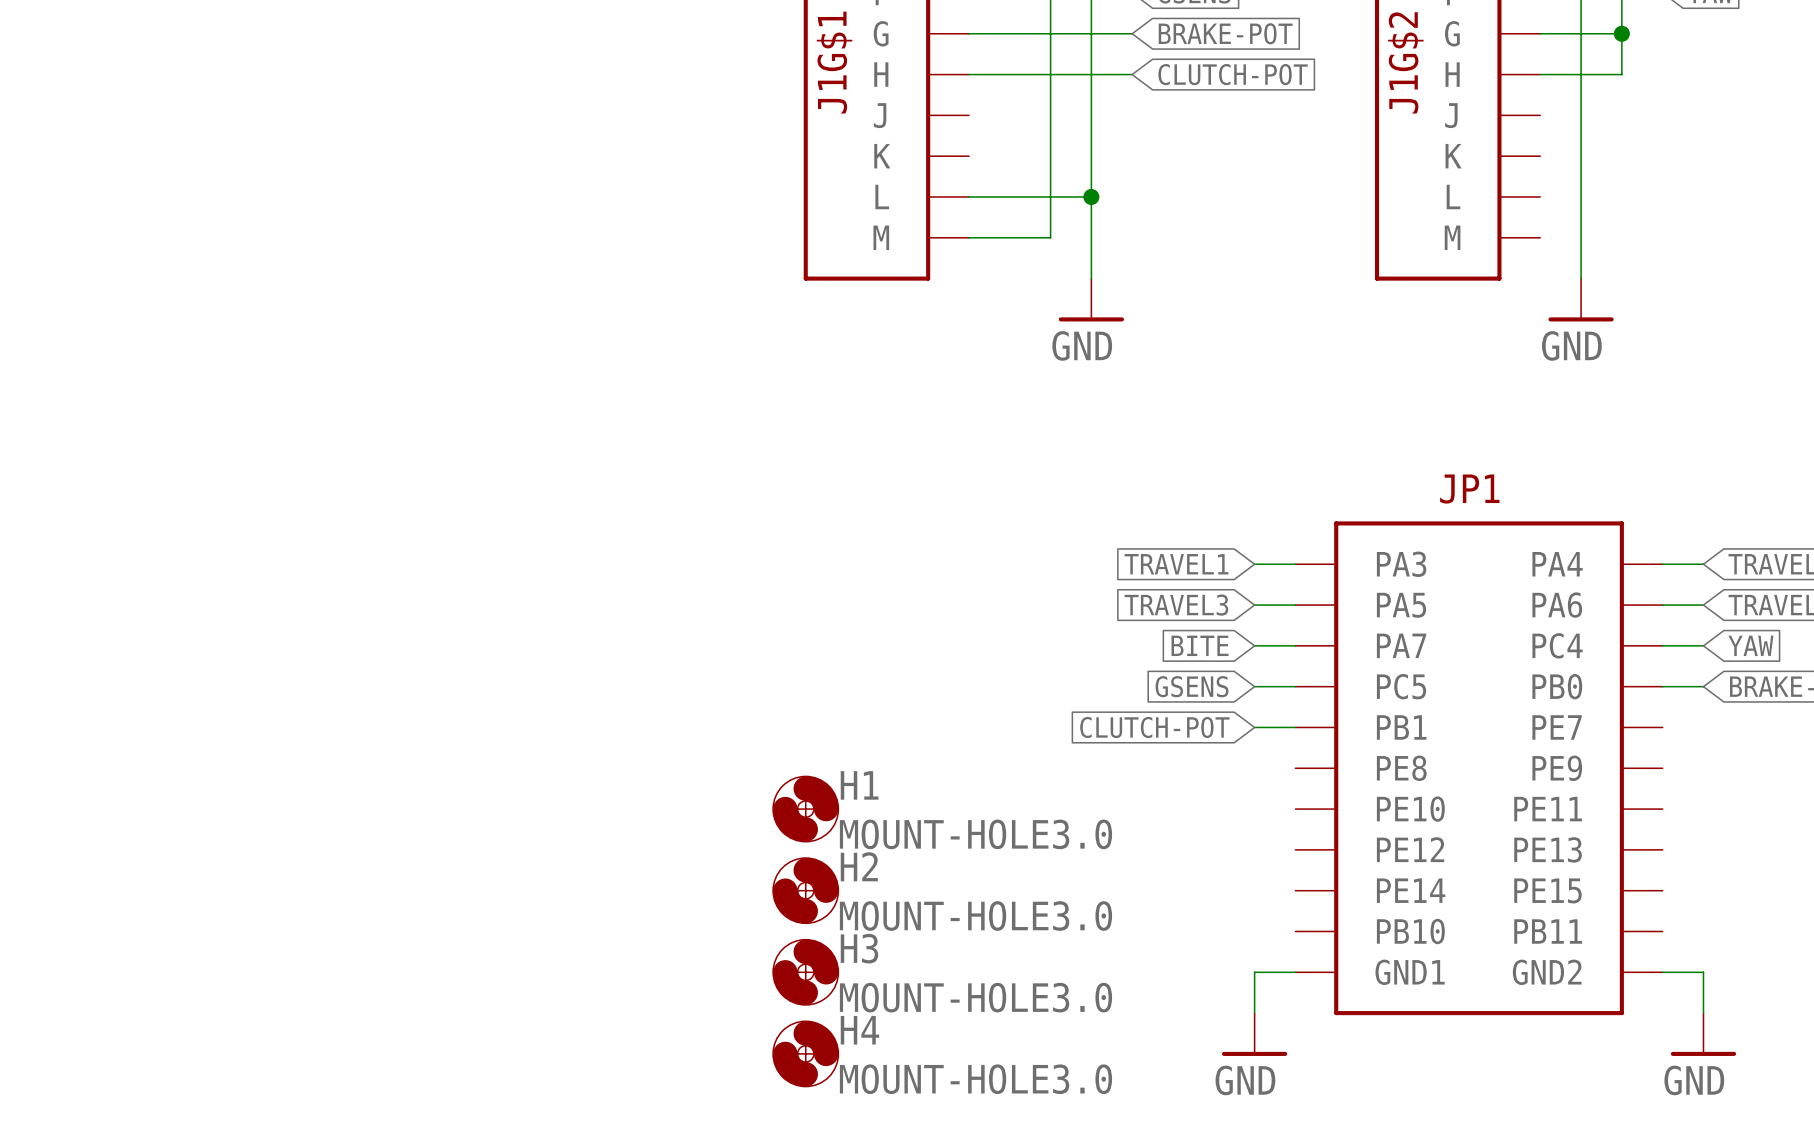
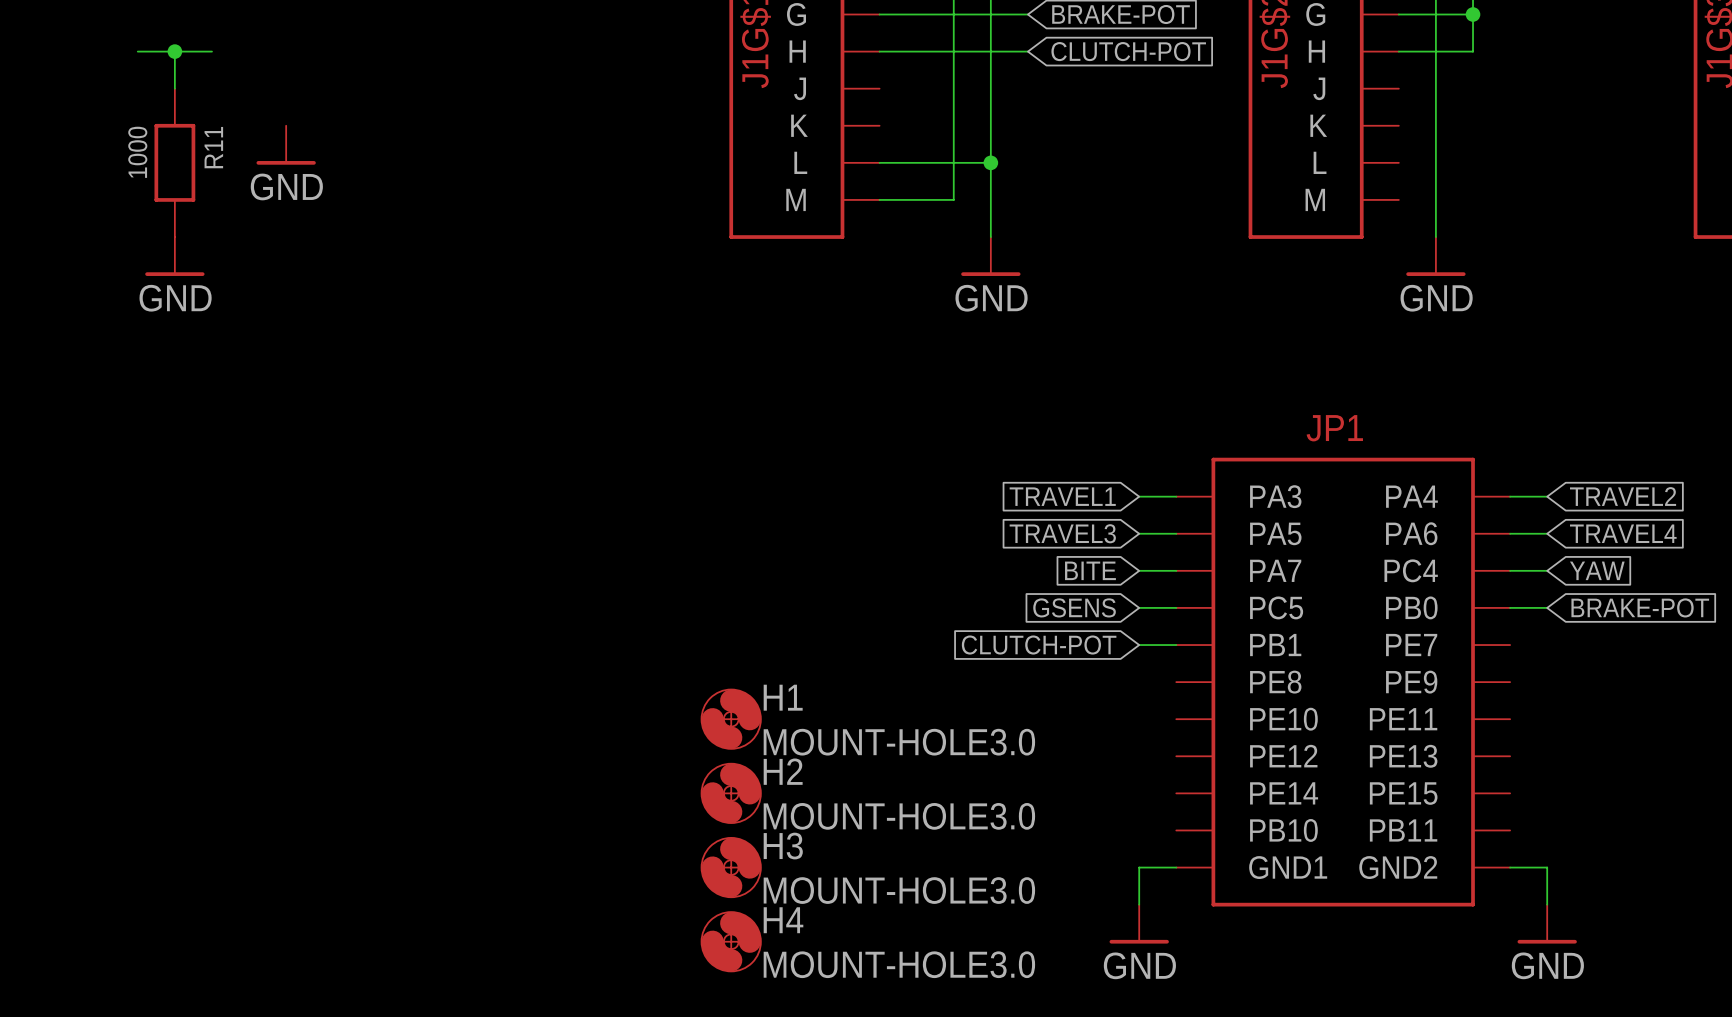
wire: none -> (137, 51) (211, 51)
wire: none -> (174, 51) (174, 88)
junction: none -> (174, 51)
power symbol: none -> GND (286, 145)
R11: none -> 1000 (174, 162)
power symbol: none -> GND (174, 256)

